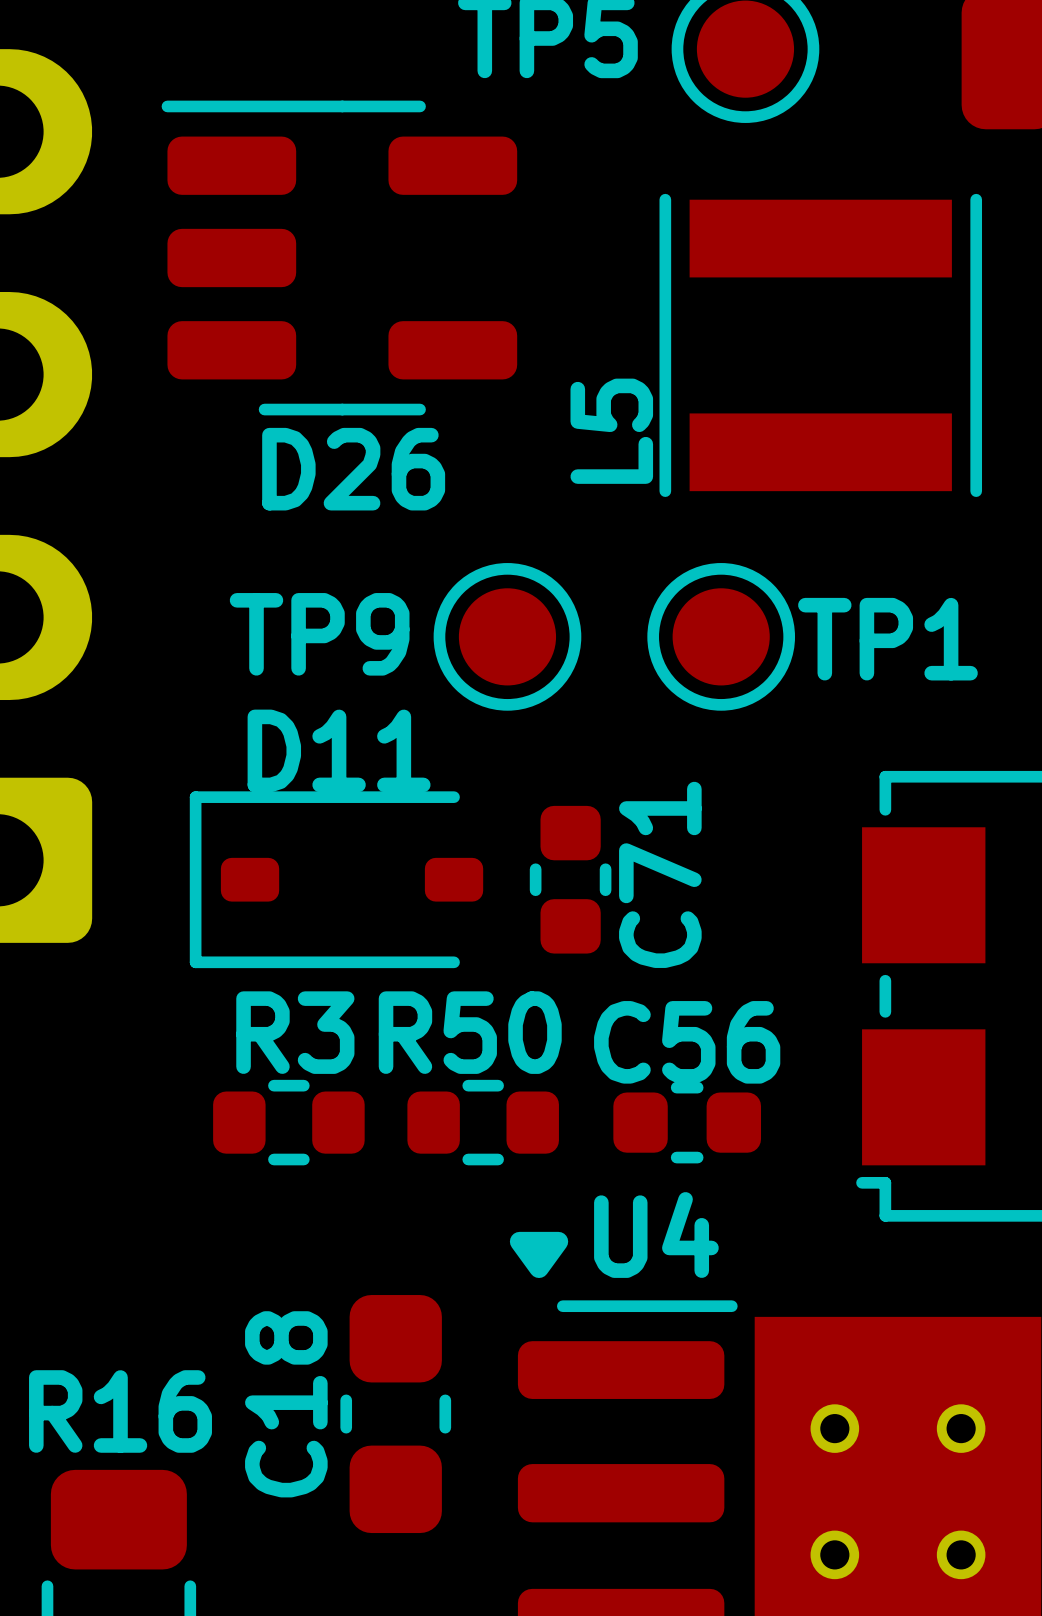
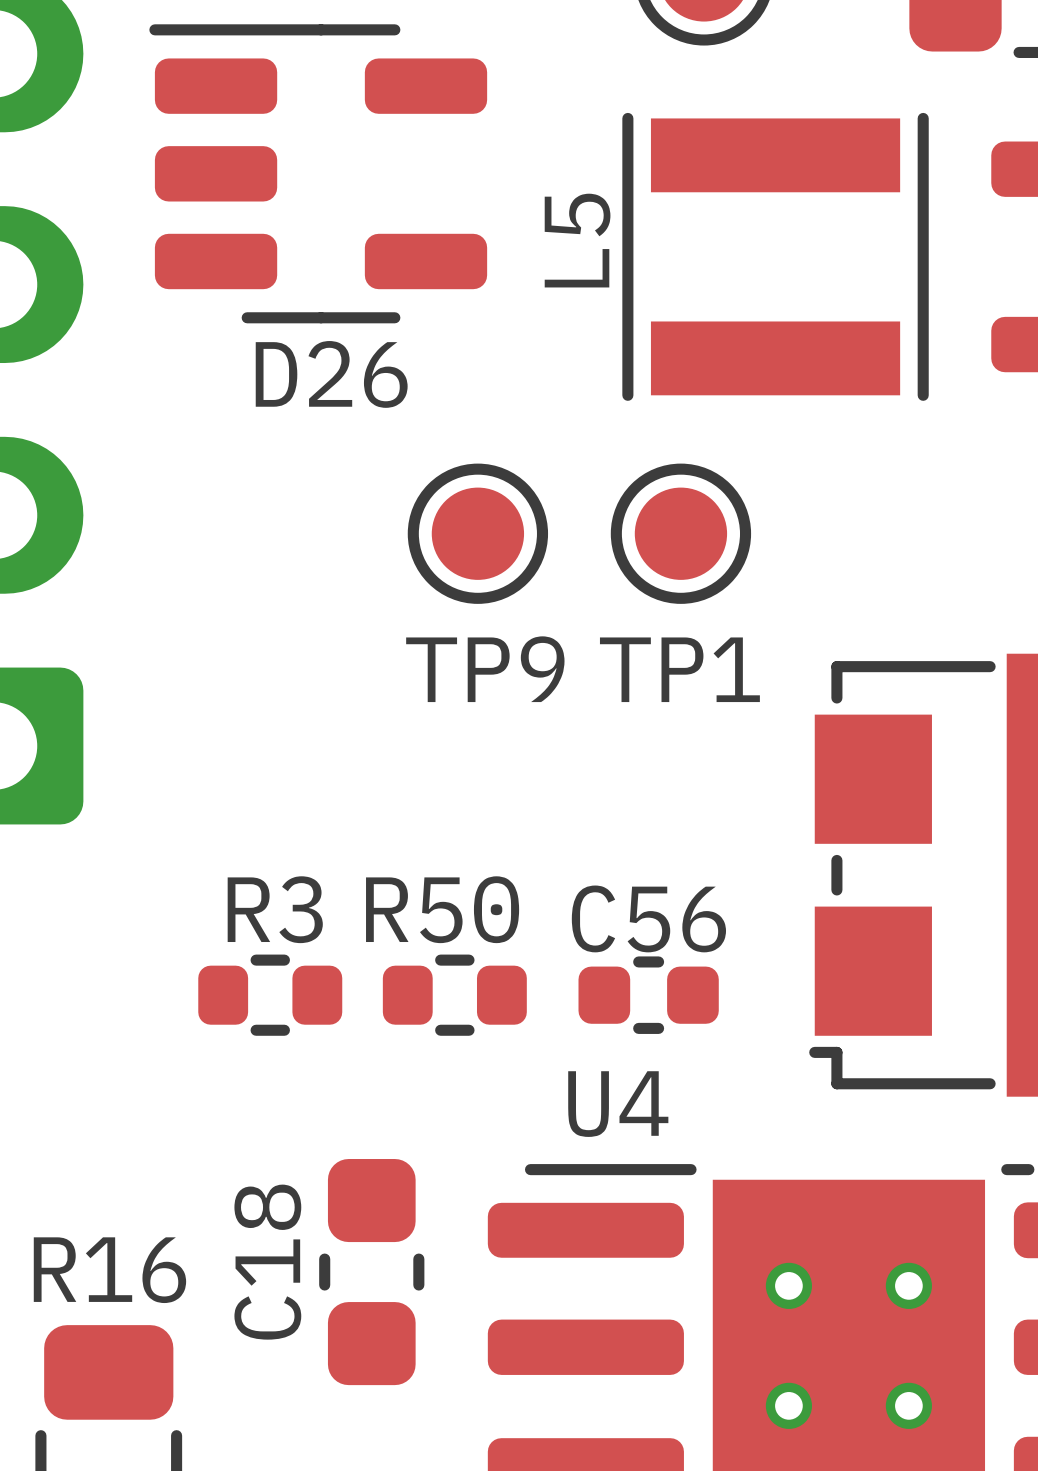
L5 name position: L5 (611, 431) -> L5 (577, 240)
TP9 name position: TP9 (319, 634) -> TP9 (485, 669)
TP1 name position: TP1 (887, 639) -> TP1 (679, 669)
D11: (336, 879) -> none
C71: (570, 879) -> none
drawing: [509, 1231, 569, 1279] -> none

